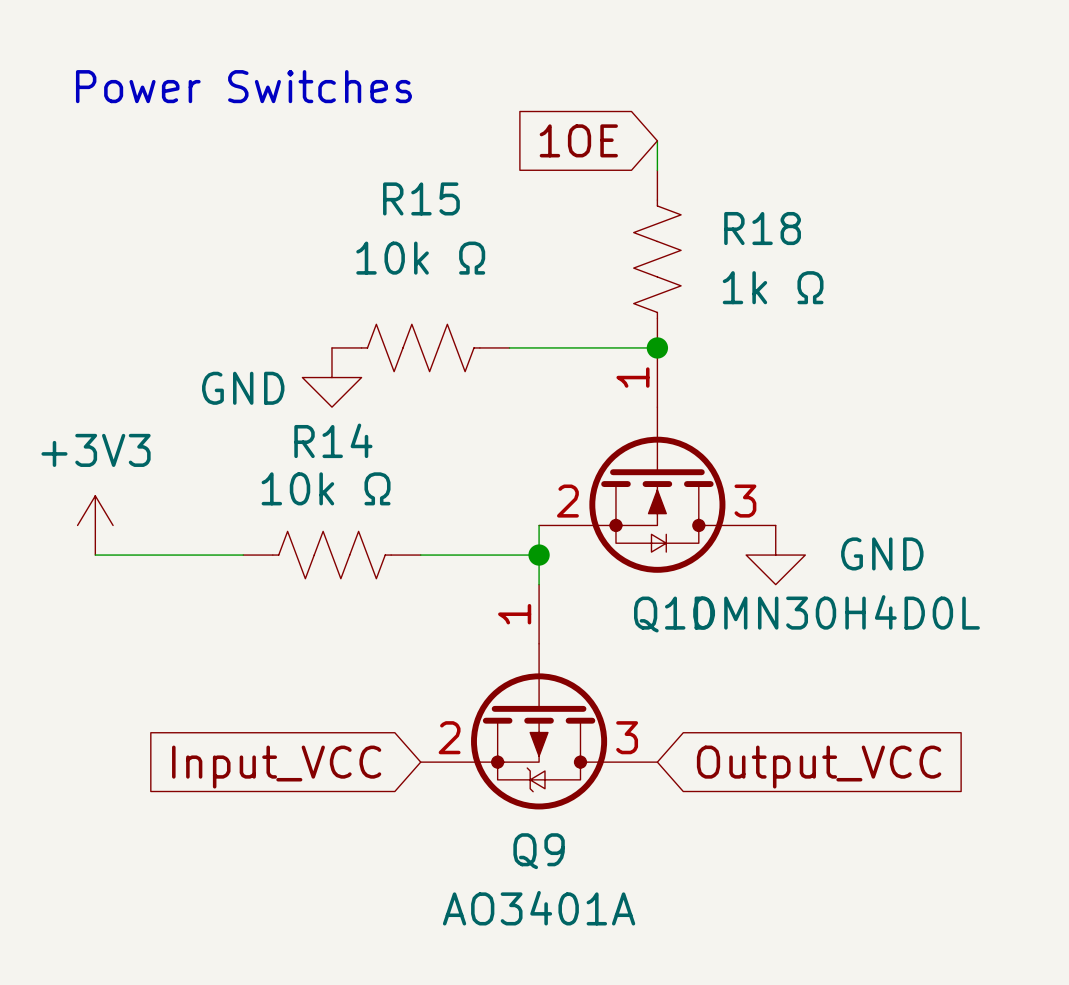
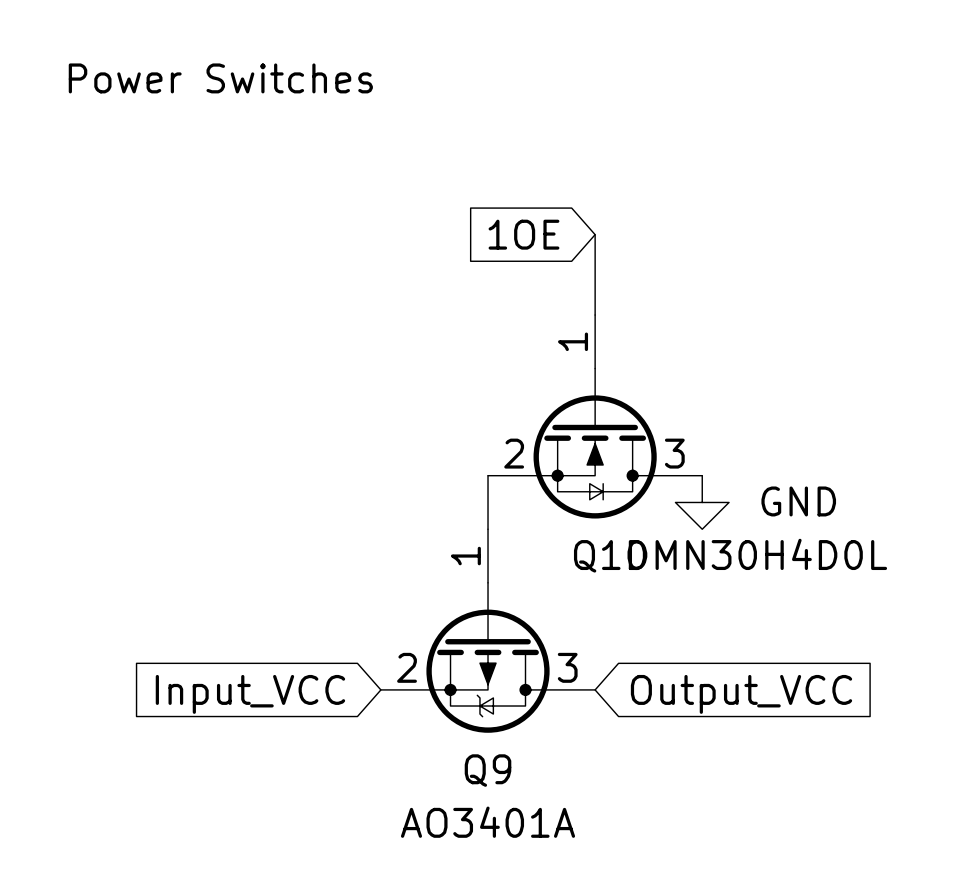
global label position: 1OE (578, 140) -> 1OE (523, 234)
wire: (657, 140) (657, 170) -> none
R18: 1k Ω (657, 259) -> none
R15: 10k Ω (420, 347) -> none
wire: (509, 347) (657, 347) -> (595, 234) (595, 315)
junction: (657, 347) -> none
power symbol: GND (331, 377) -> none
power symbol: +3V3 (95, 525) -> none
wire: (95, 555) (243, 555) -> none
R14: 10k Ω (331, 555) -> none
wire: (420, 555) (539, 555) -> none
junction: (539, 555) -> none

